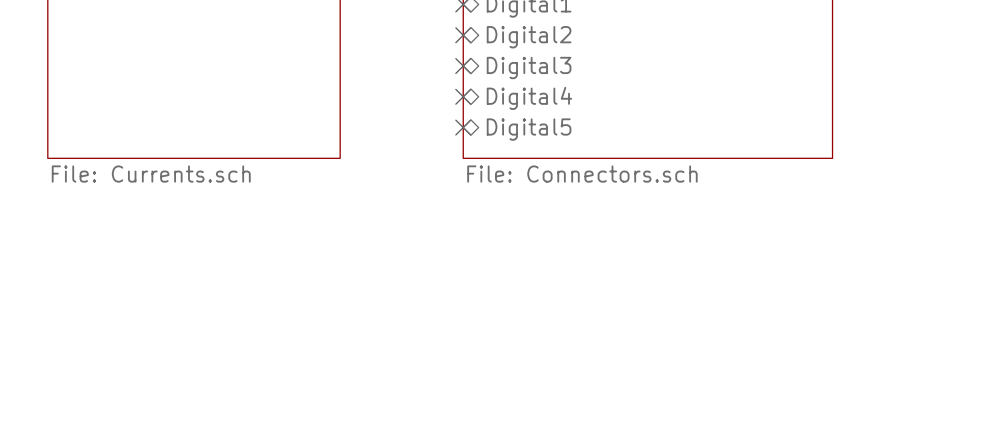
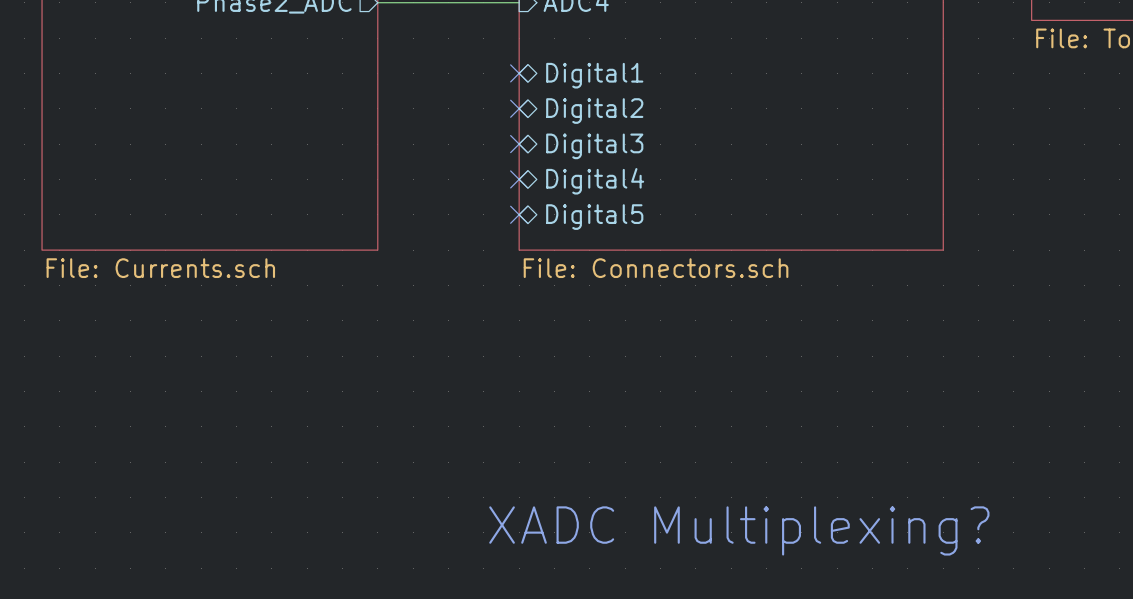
text: none -> XADC Multiplexing? (739, 530)

